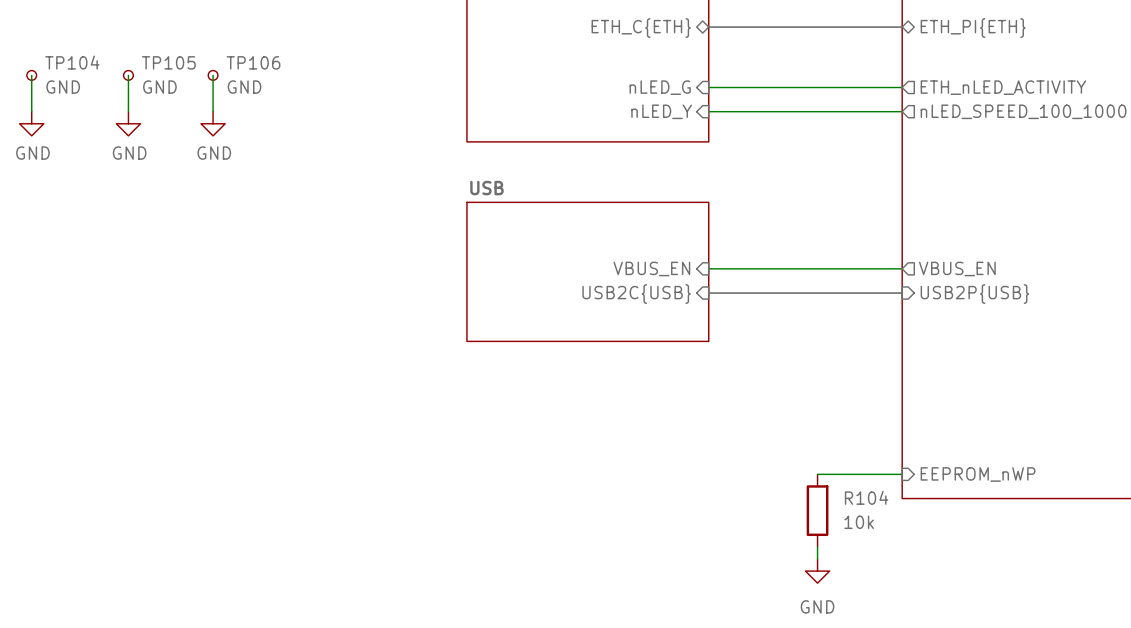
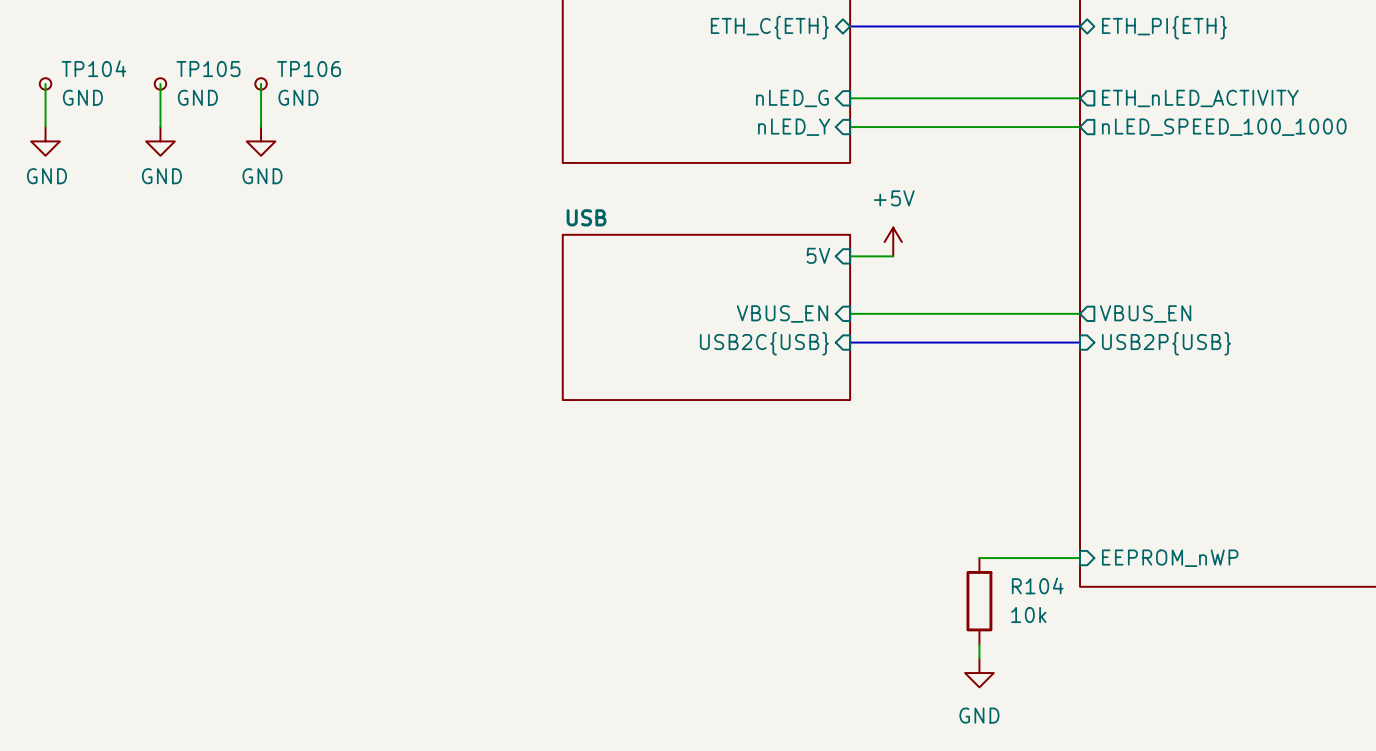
power symbol: none -> +5V (893, 241)
sheet pin: none -> 5V (818, 255)
wire: none -> (850, 256) (893, 256)

